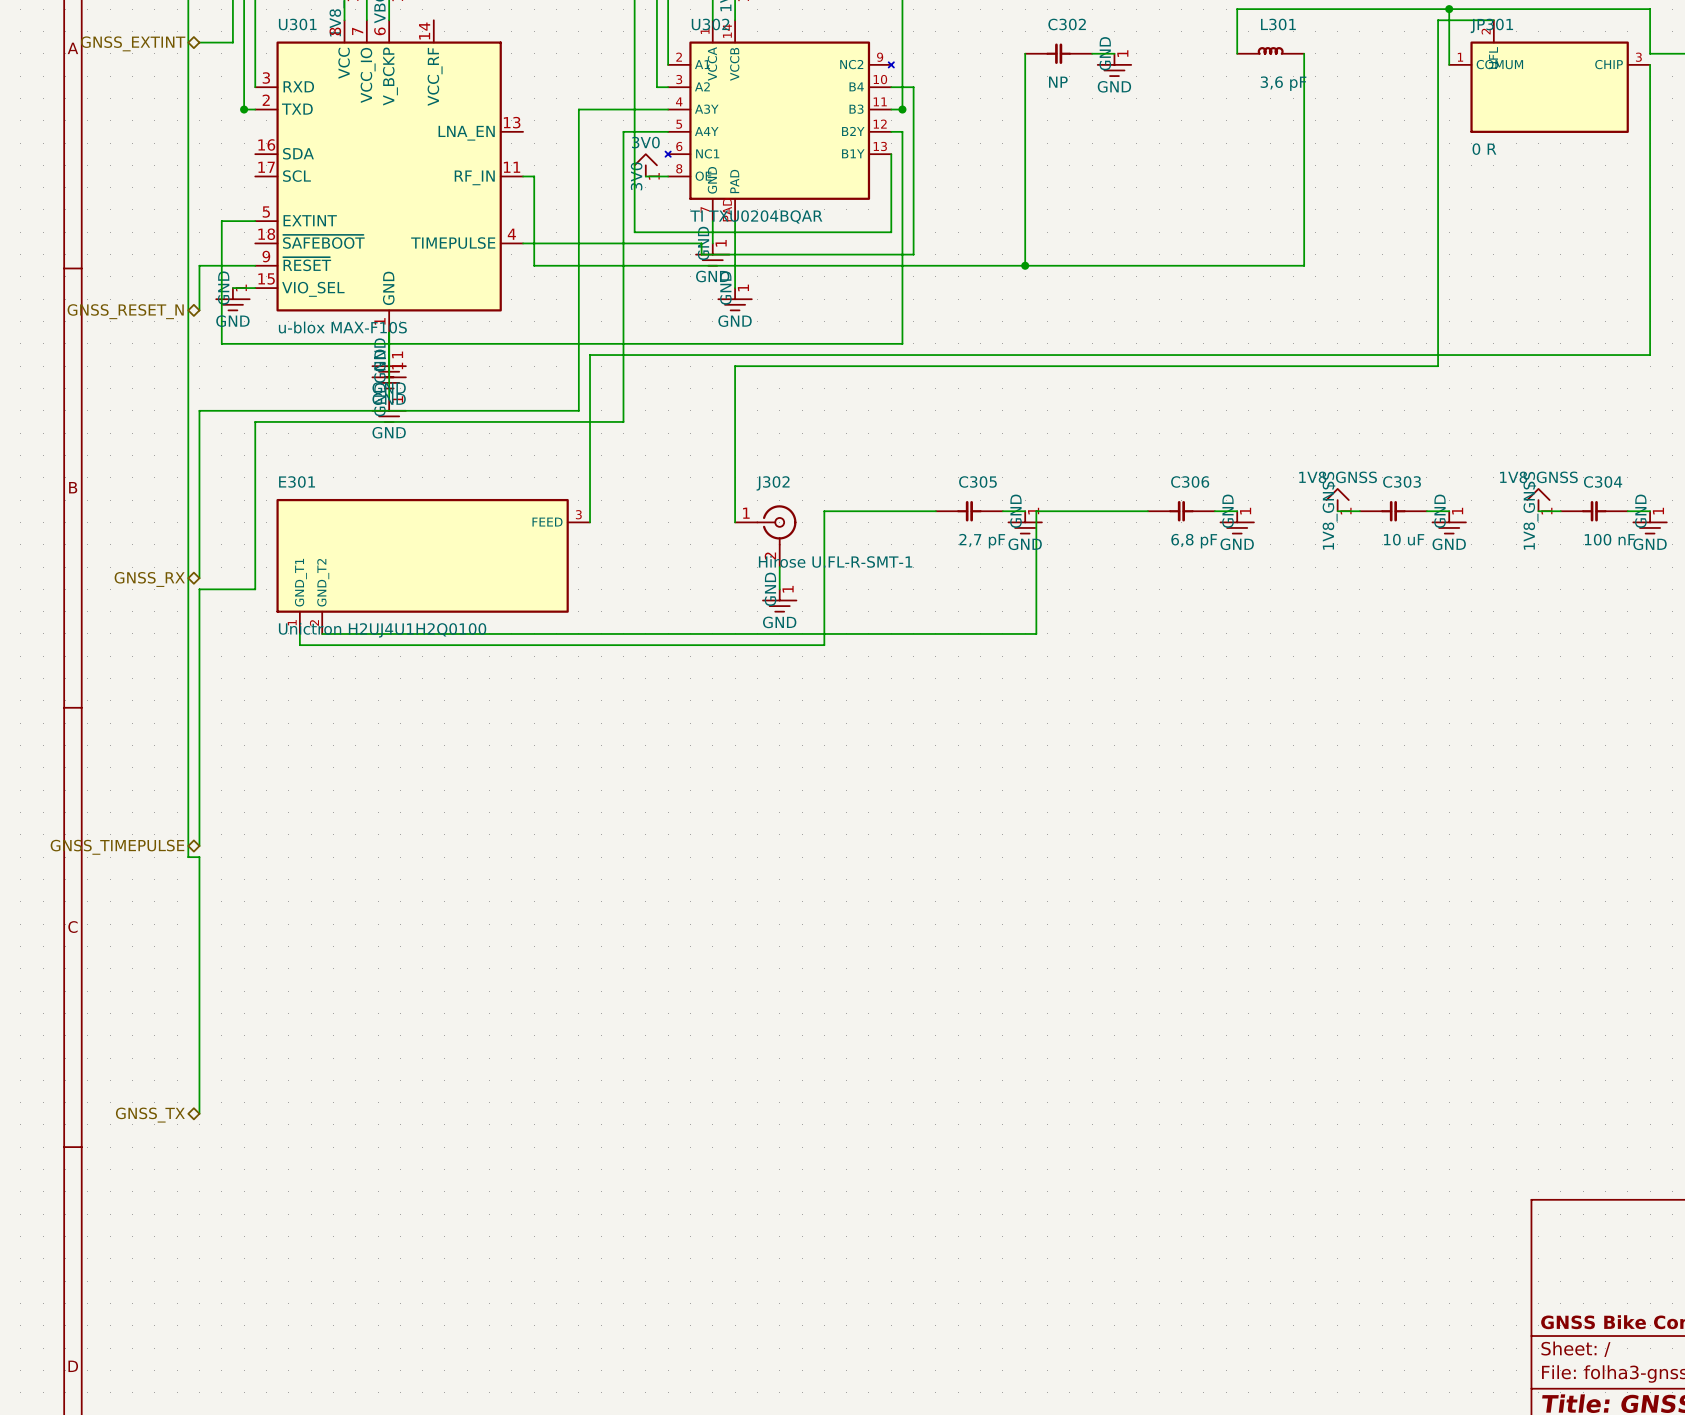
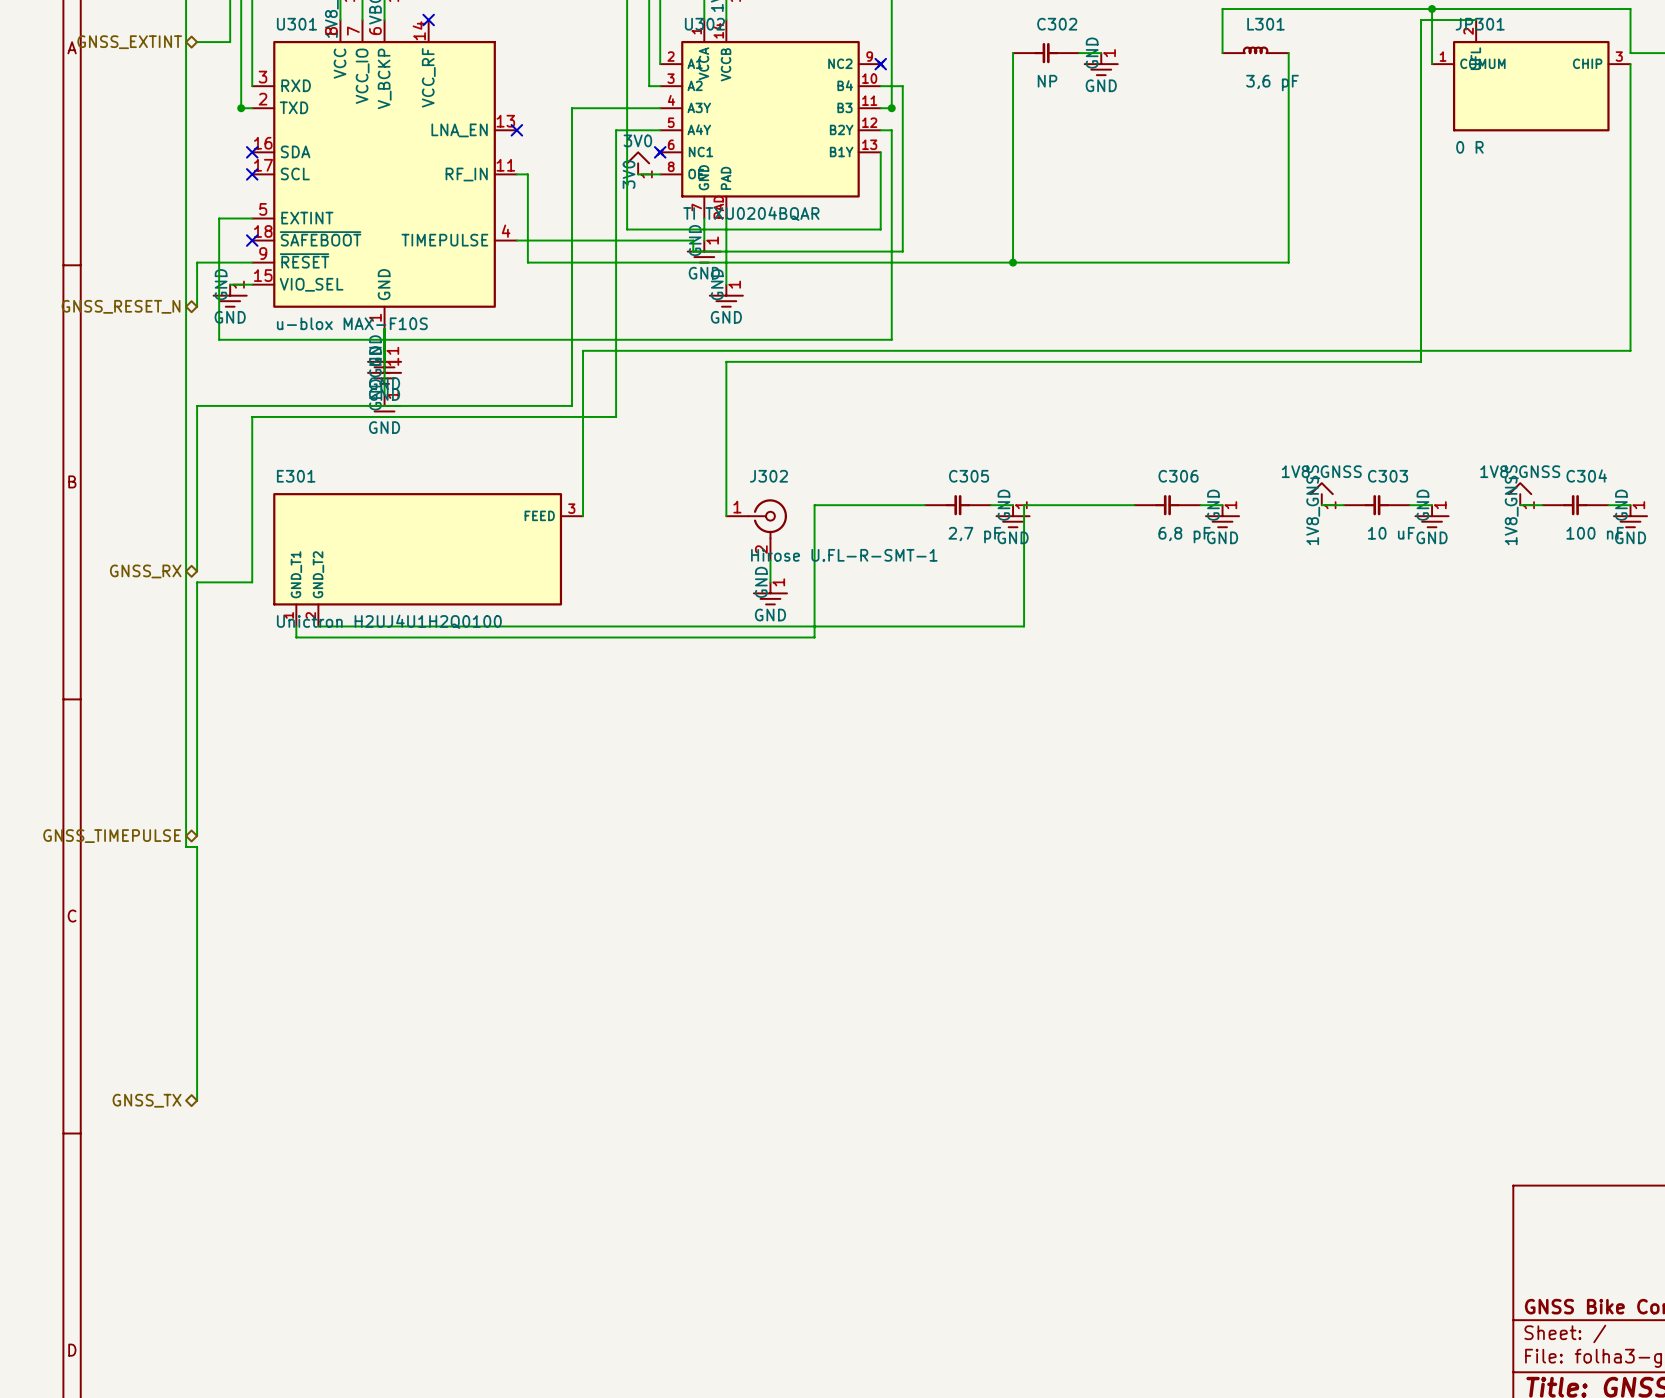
no-connect mark: none -> (428, 20)
no-connect mark: none -> (880, 64)
no-connect mark: none -> (516, 130)
no-connect mark: none -> (252, 152)
no-connect mark: none -> (660, 152)
no-connect mark: none -> (252, 174)
no-connect mark: none -> (252, 240)

